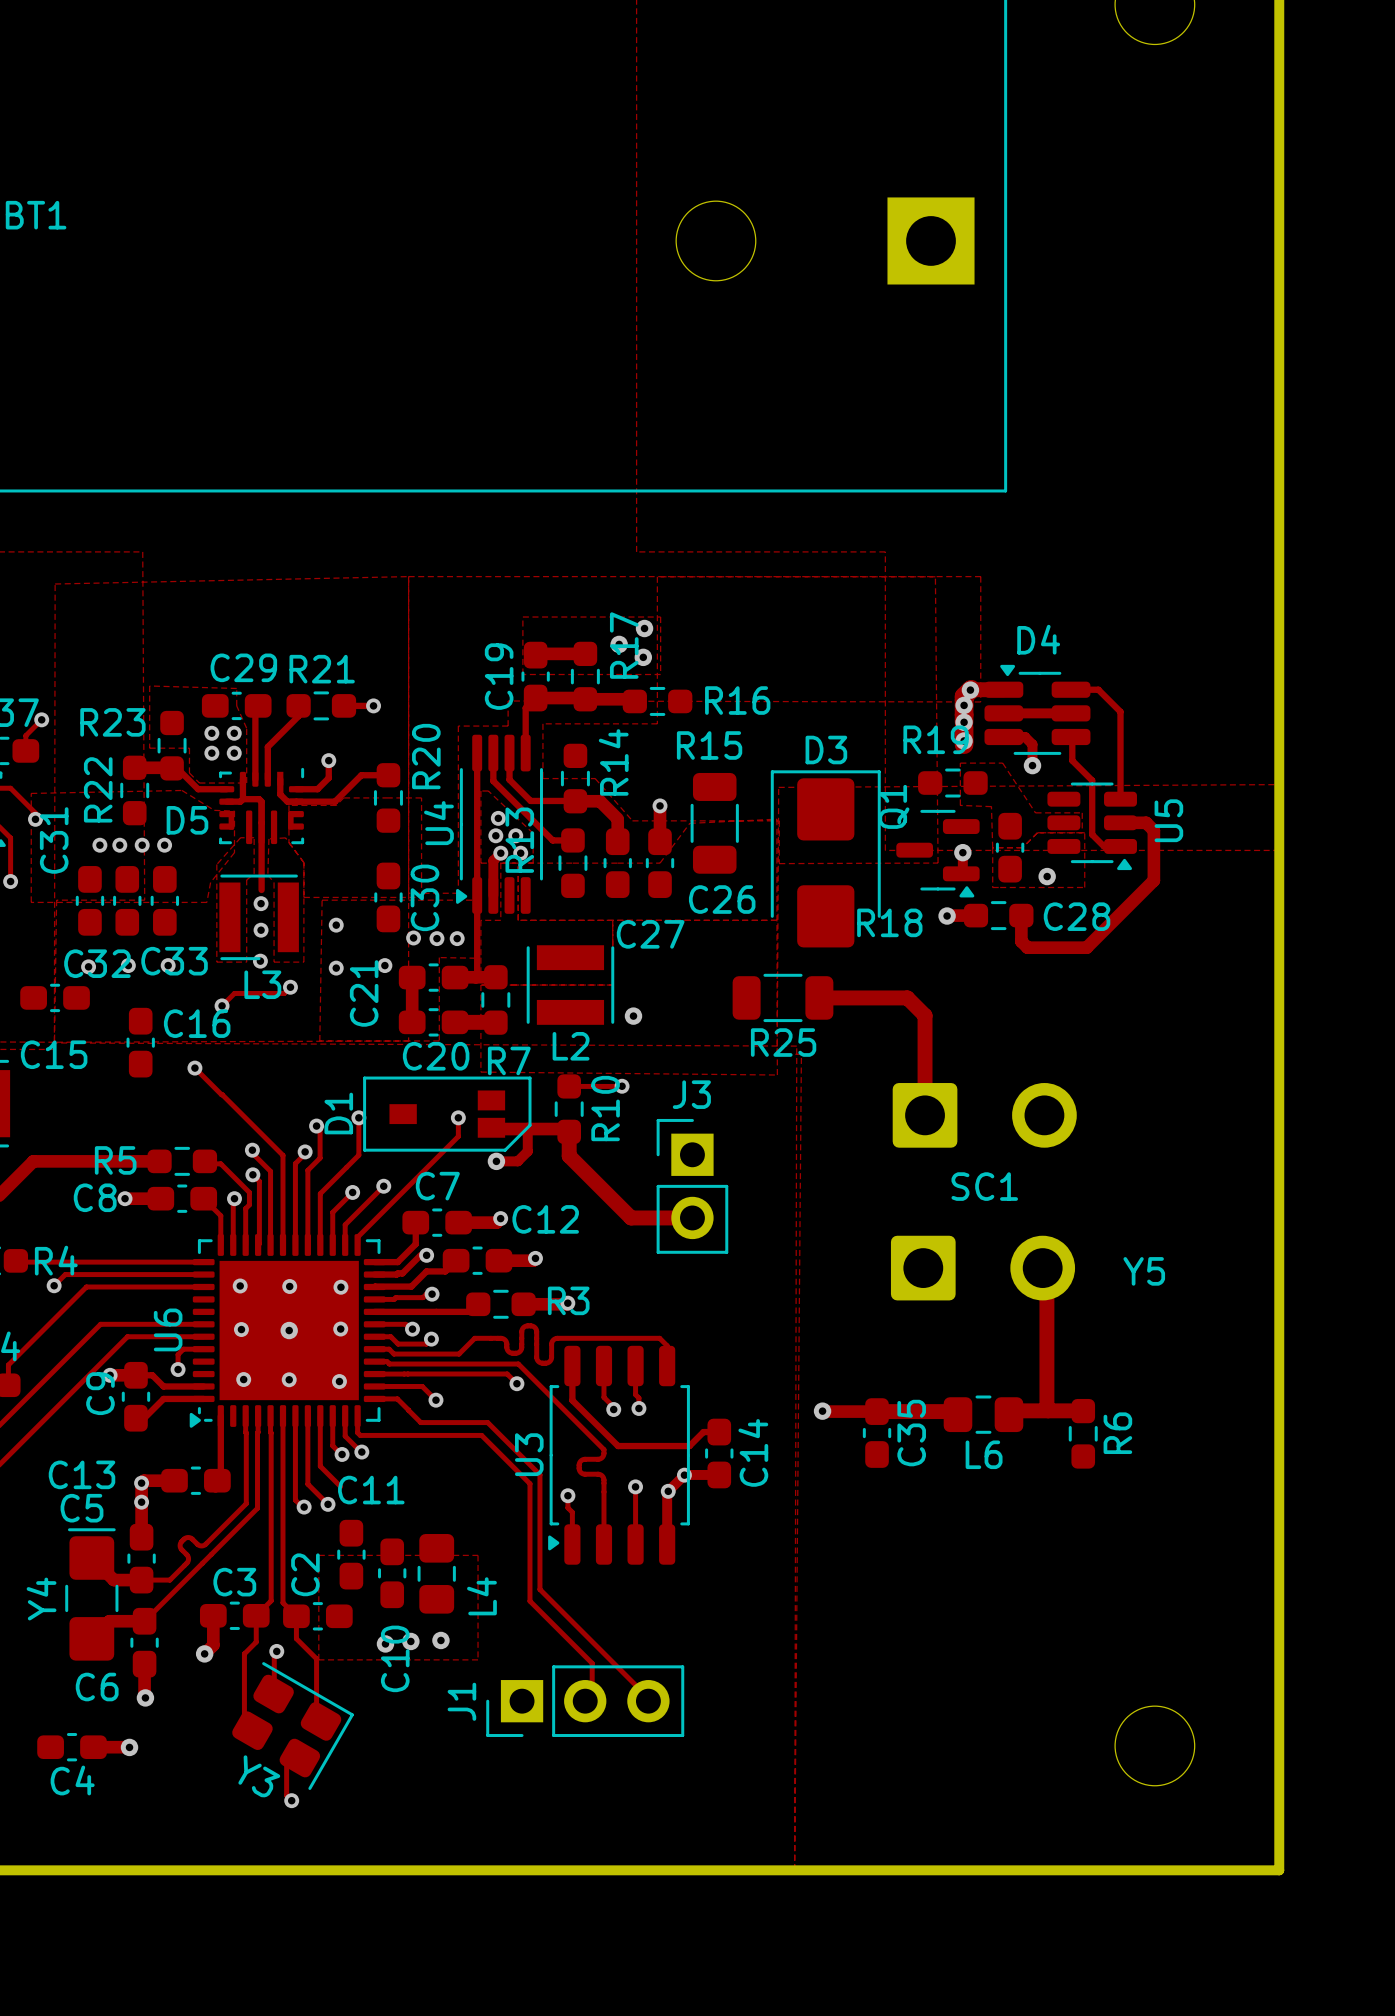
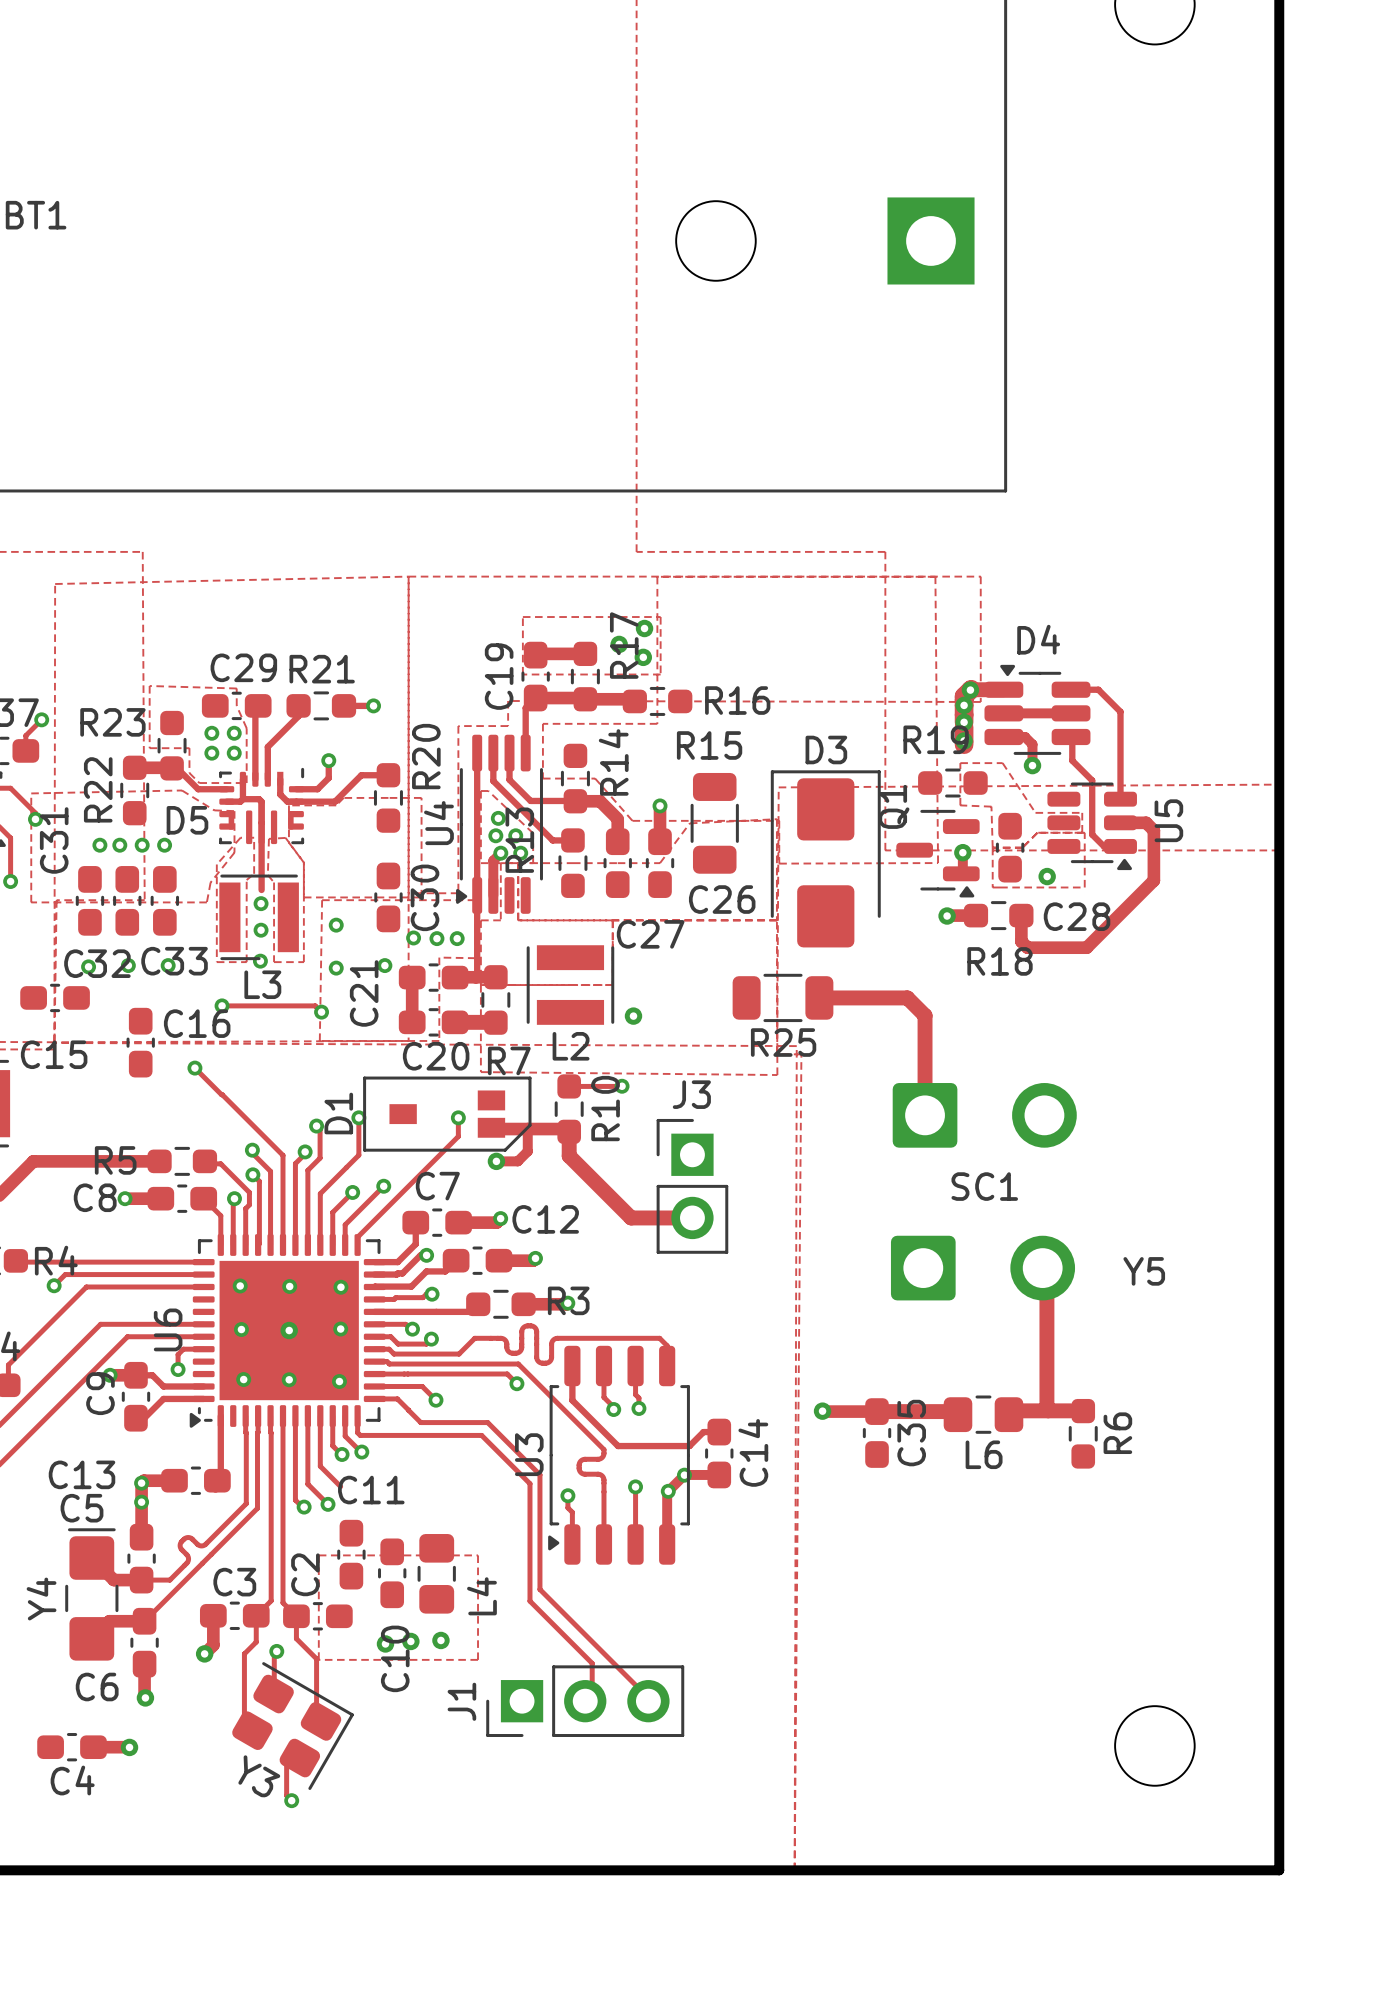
R18 name position: R18 (889, 922) -> R18 (1000, 961)
track: (290, 987) (284, 993) (234, 993) (222, 1005) -> (321, 1012) (315, 1005) (222, 1005)
via position: (290, 987) -> (321, 1012)

